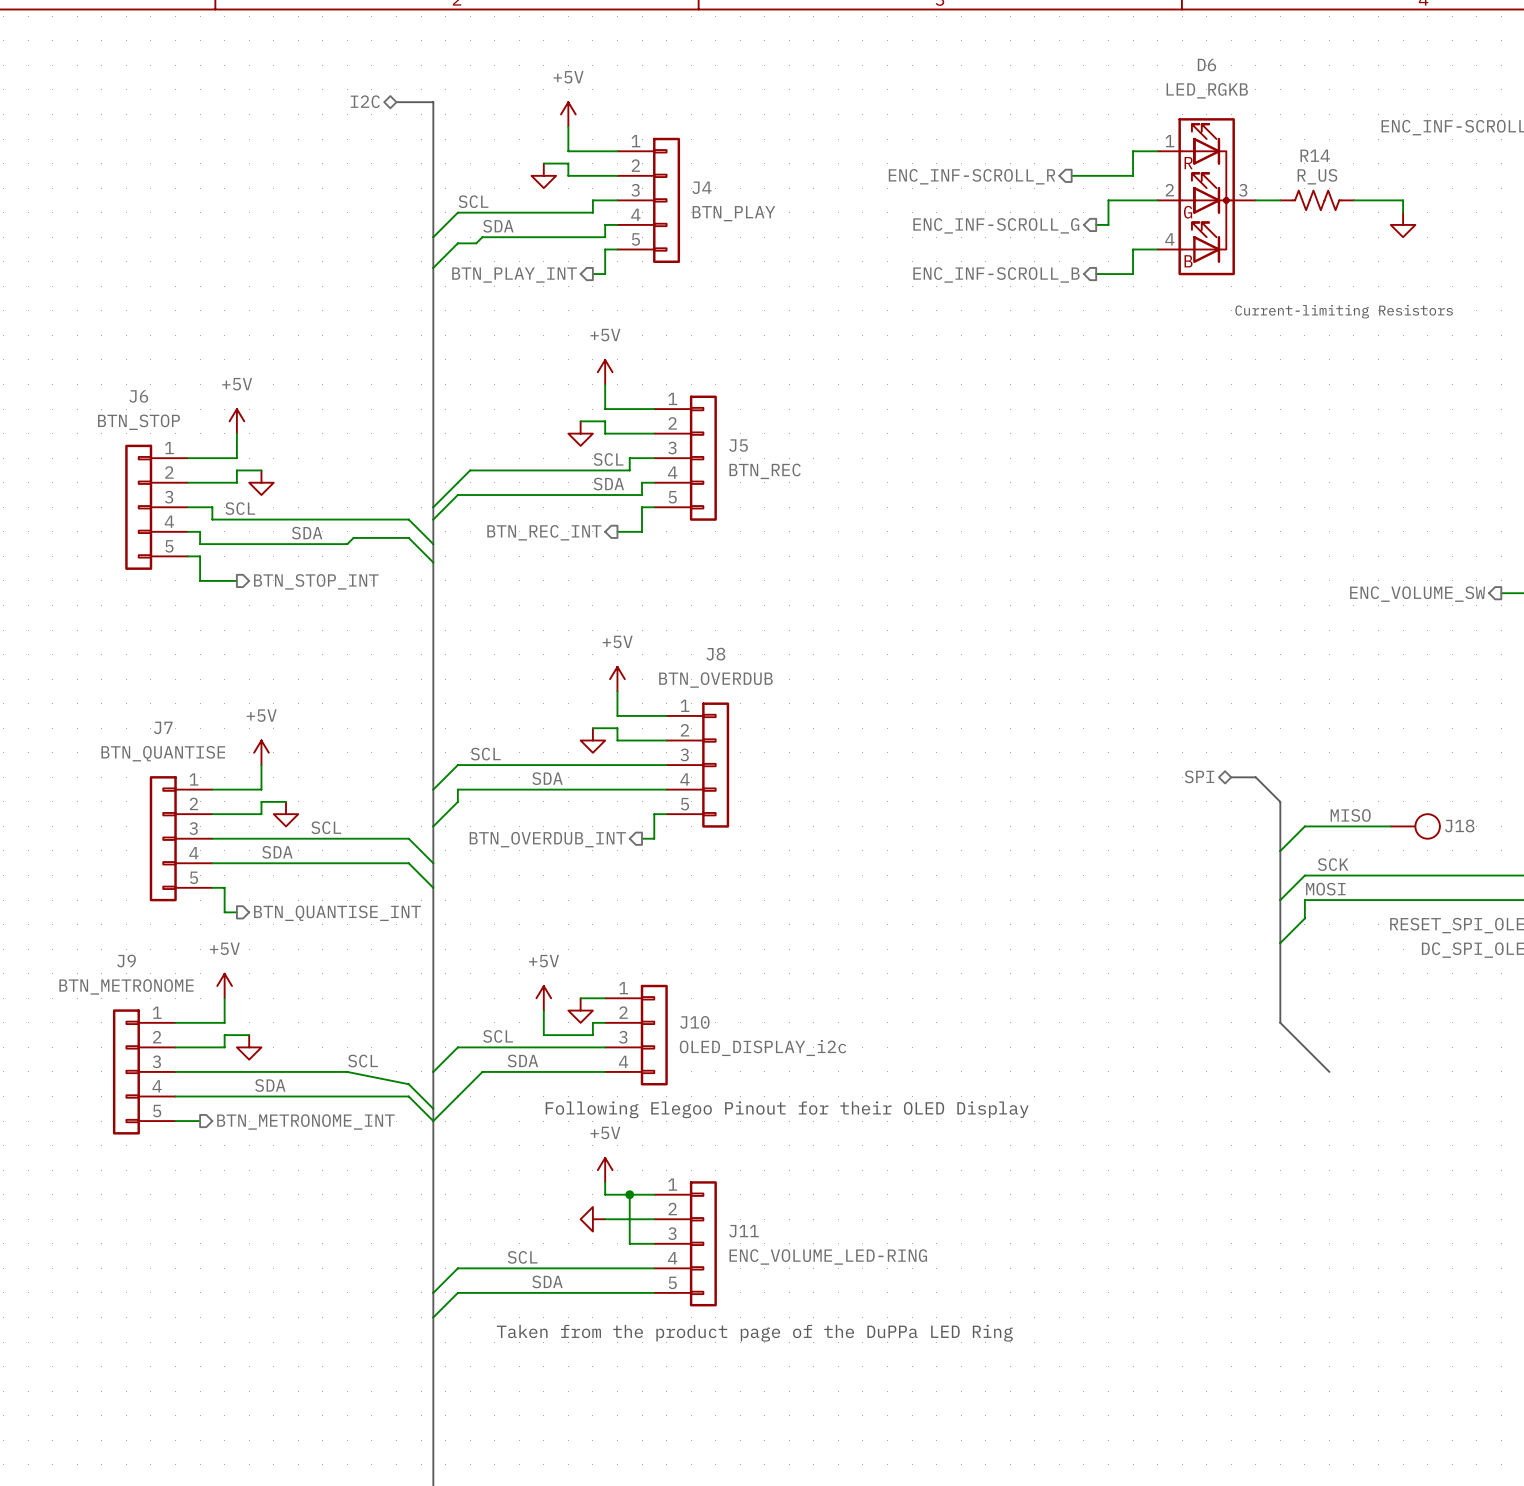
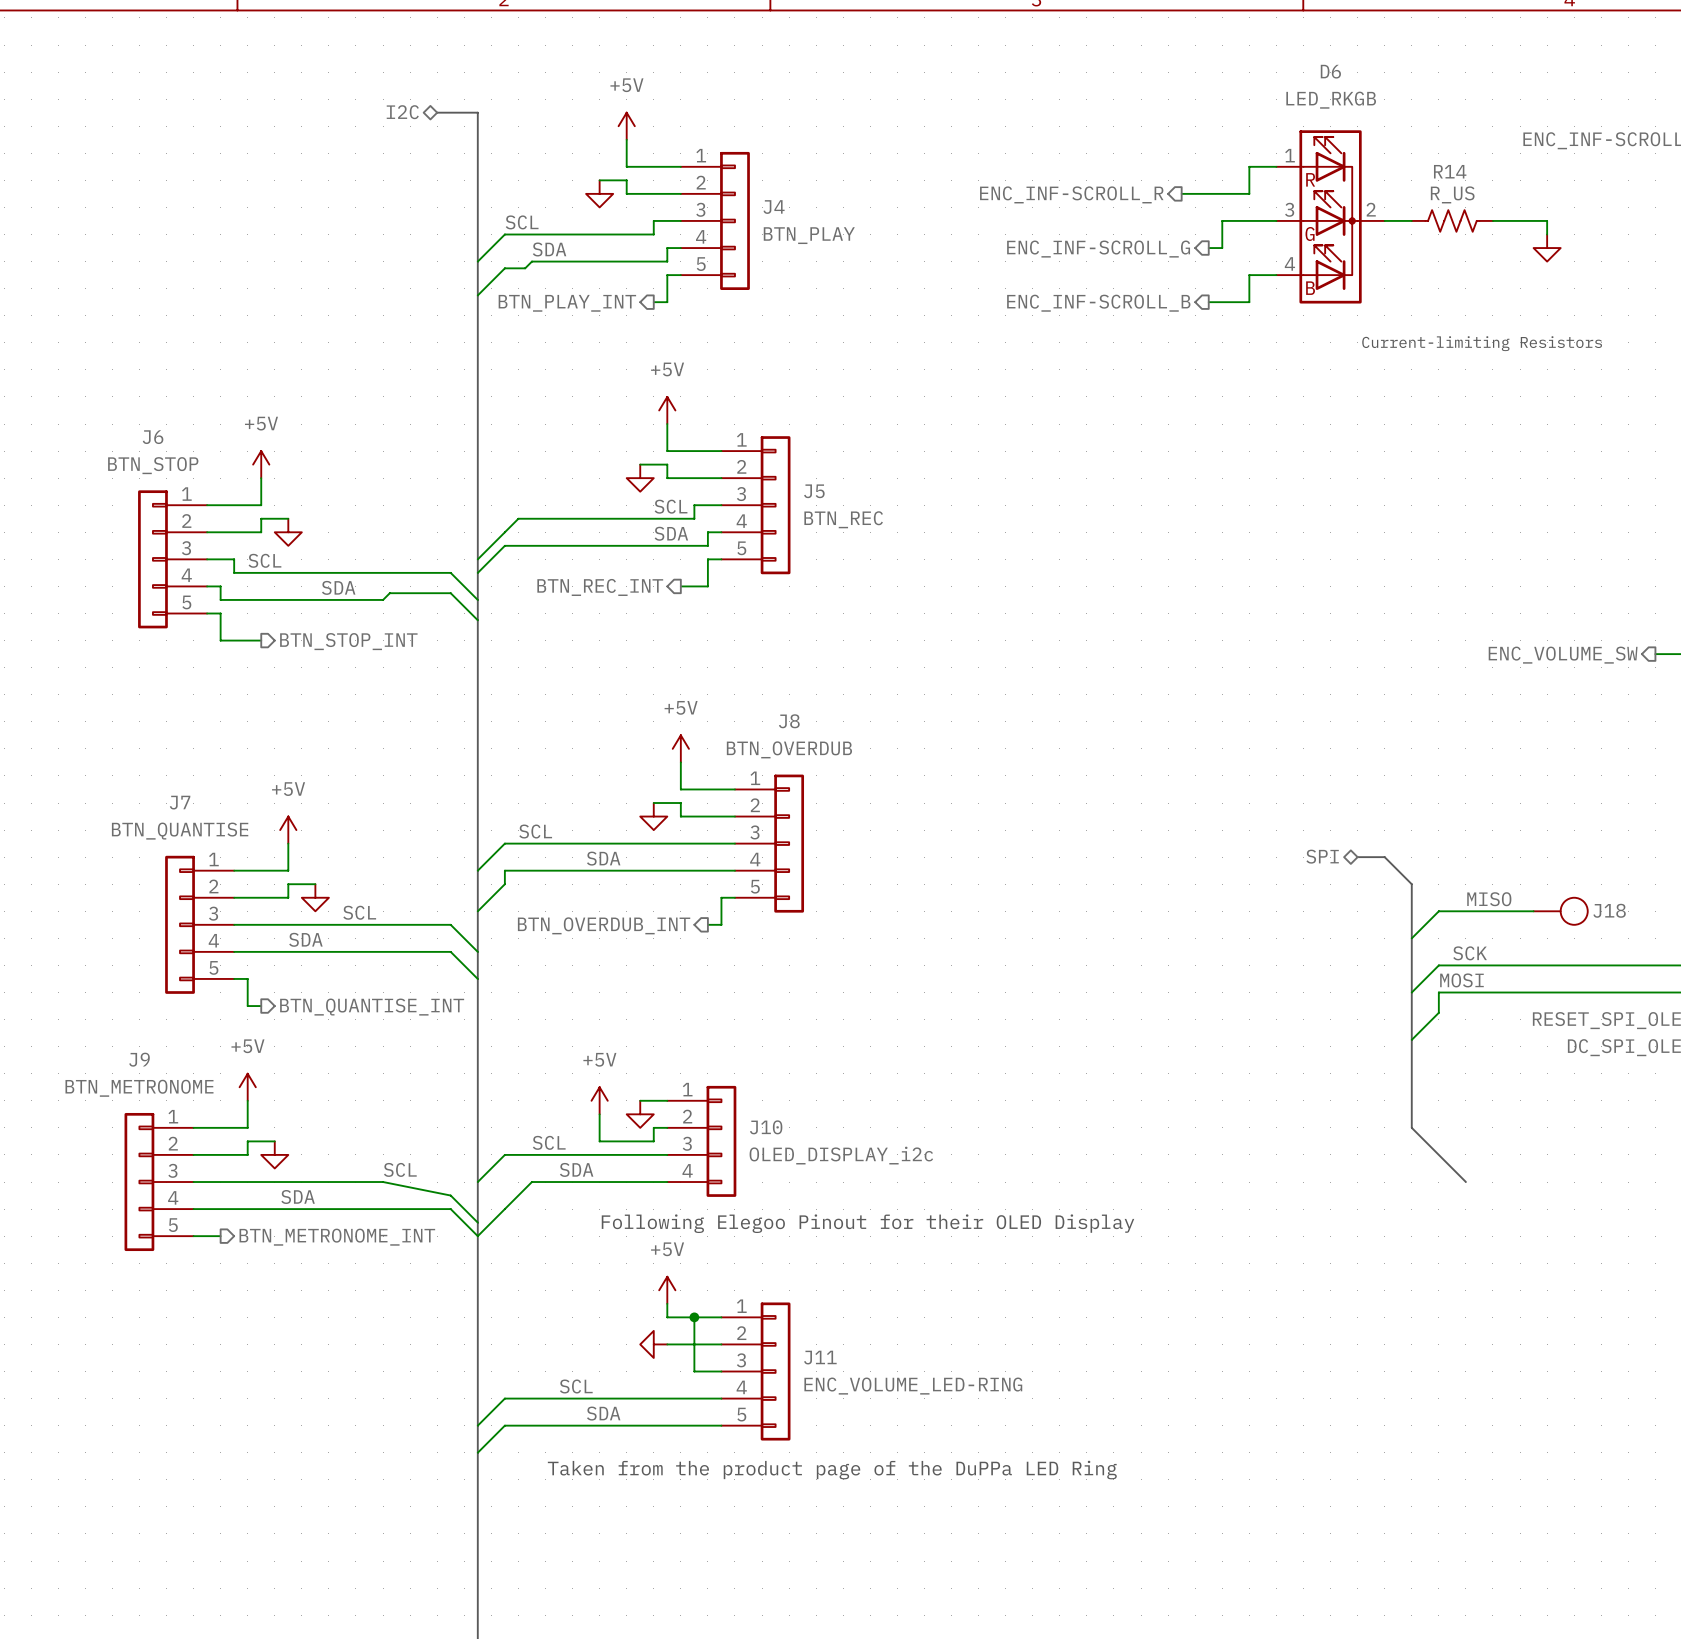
D6 value: LED_RGKB (1207, 90) -> LED_RKGB (1331, 100)
D6 pin number: 2 (1169, 190) -> 3 (1289, 209)
D6 pin number: 3 (1243, 190) -> 2 (1371, 209)

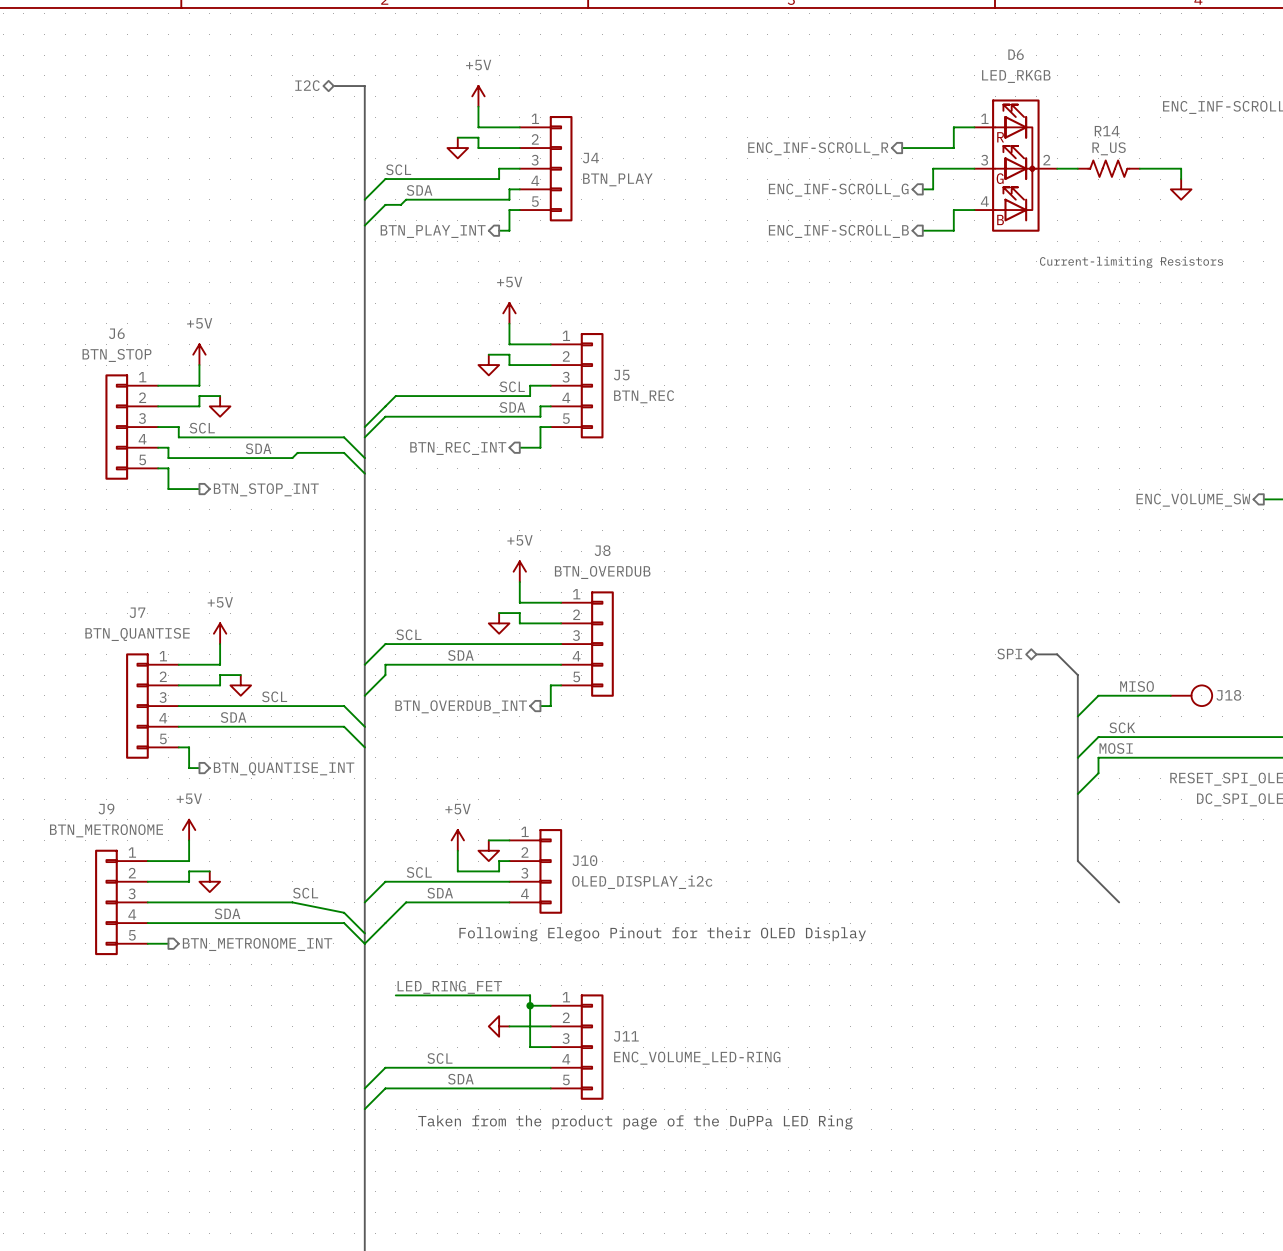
power symbol: +5V (667, 1290) -> none
label: none -> LED_RING_FET (449, 987)
wire: (667, 1303) (667, 1317) (694, 1317) -> (395, 995) (530, 995) (530, 1005)

